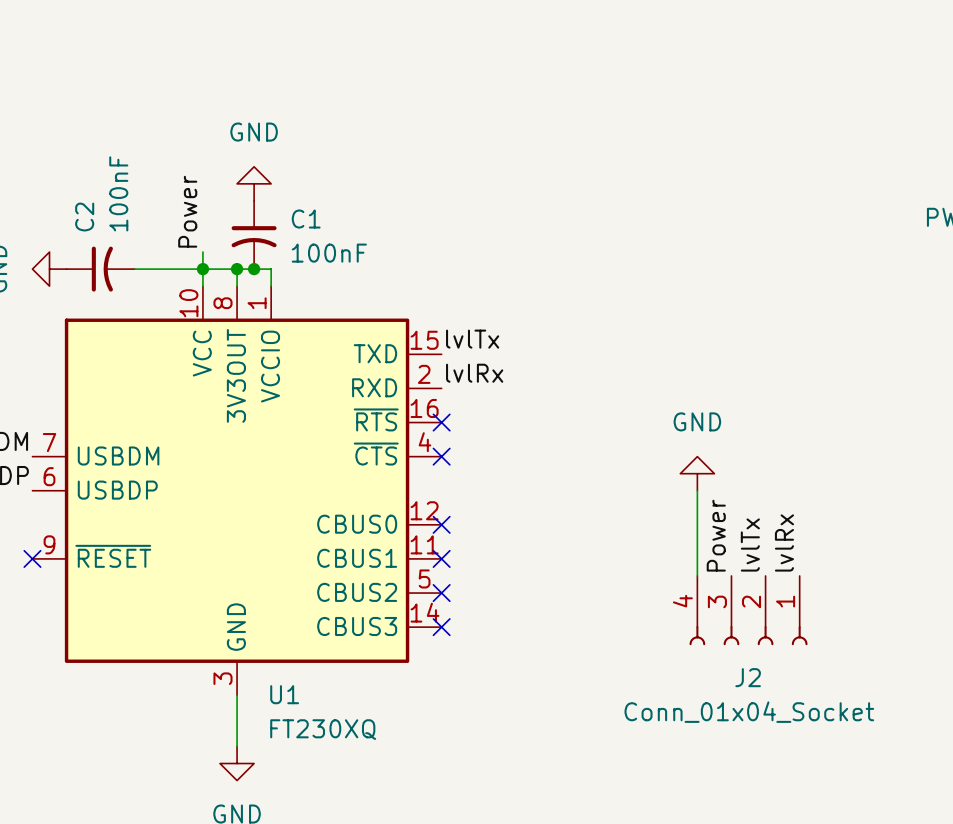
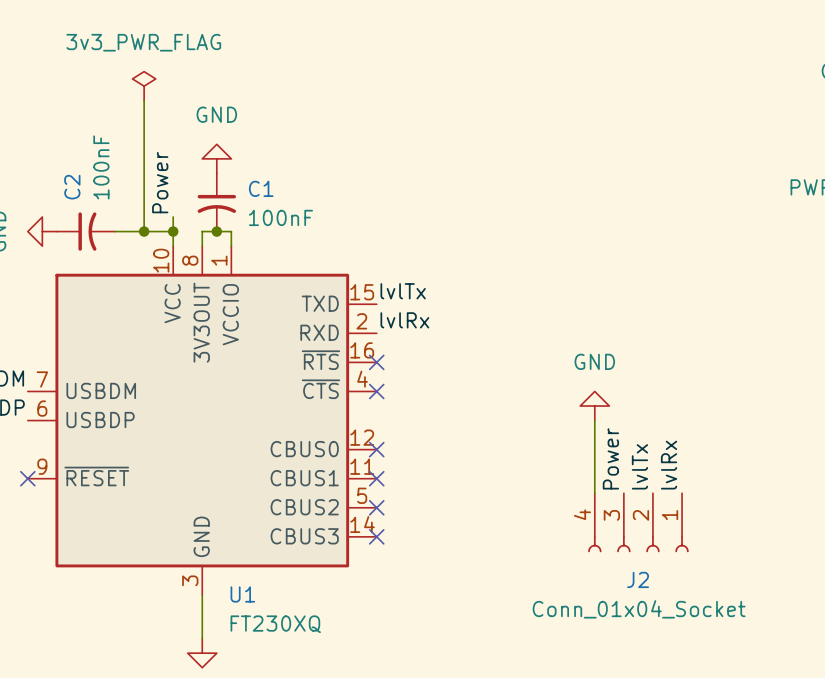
power symbol: none -> 3v3_PWR_FLAG (144, 86)
wire: none -> (144, 100) (144, 231)
wire: (202, 269) (237, 269) -> none
junction position: (237, 269) -> (144, 231)

